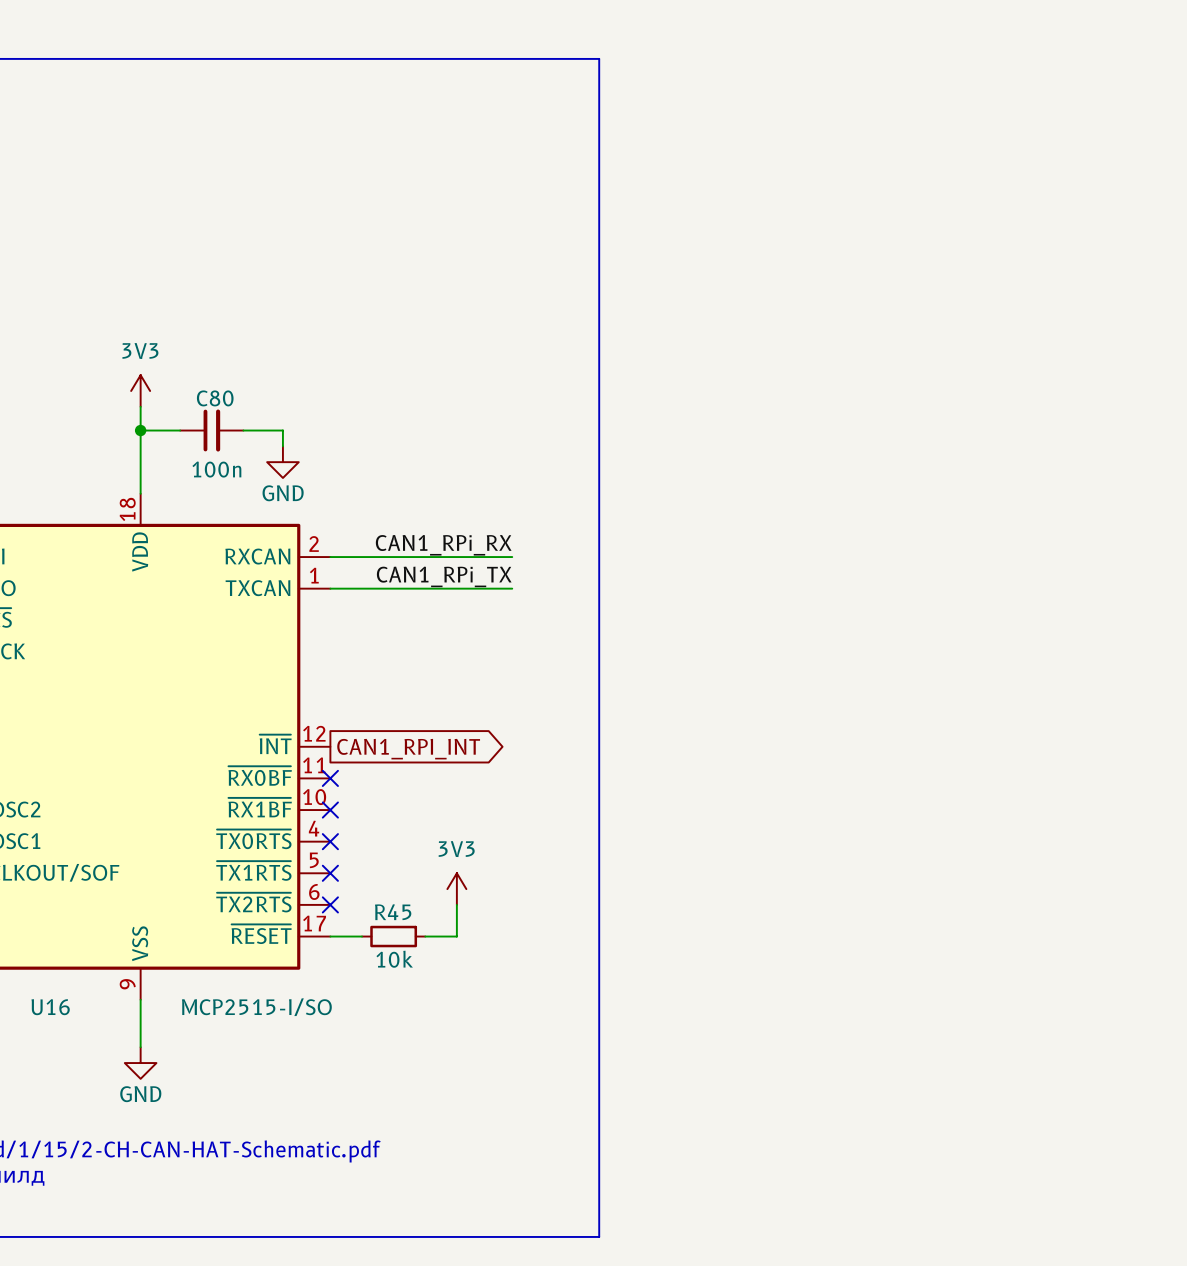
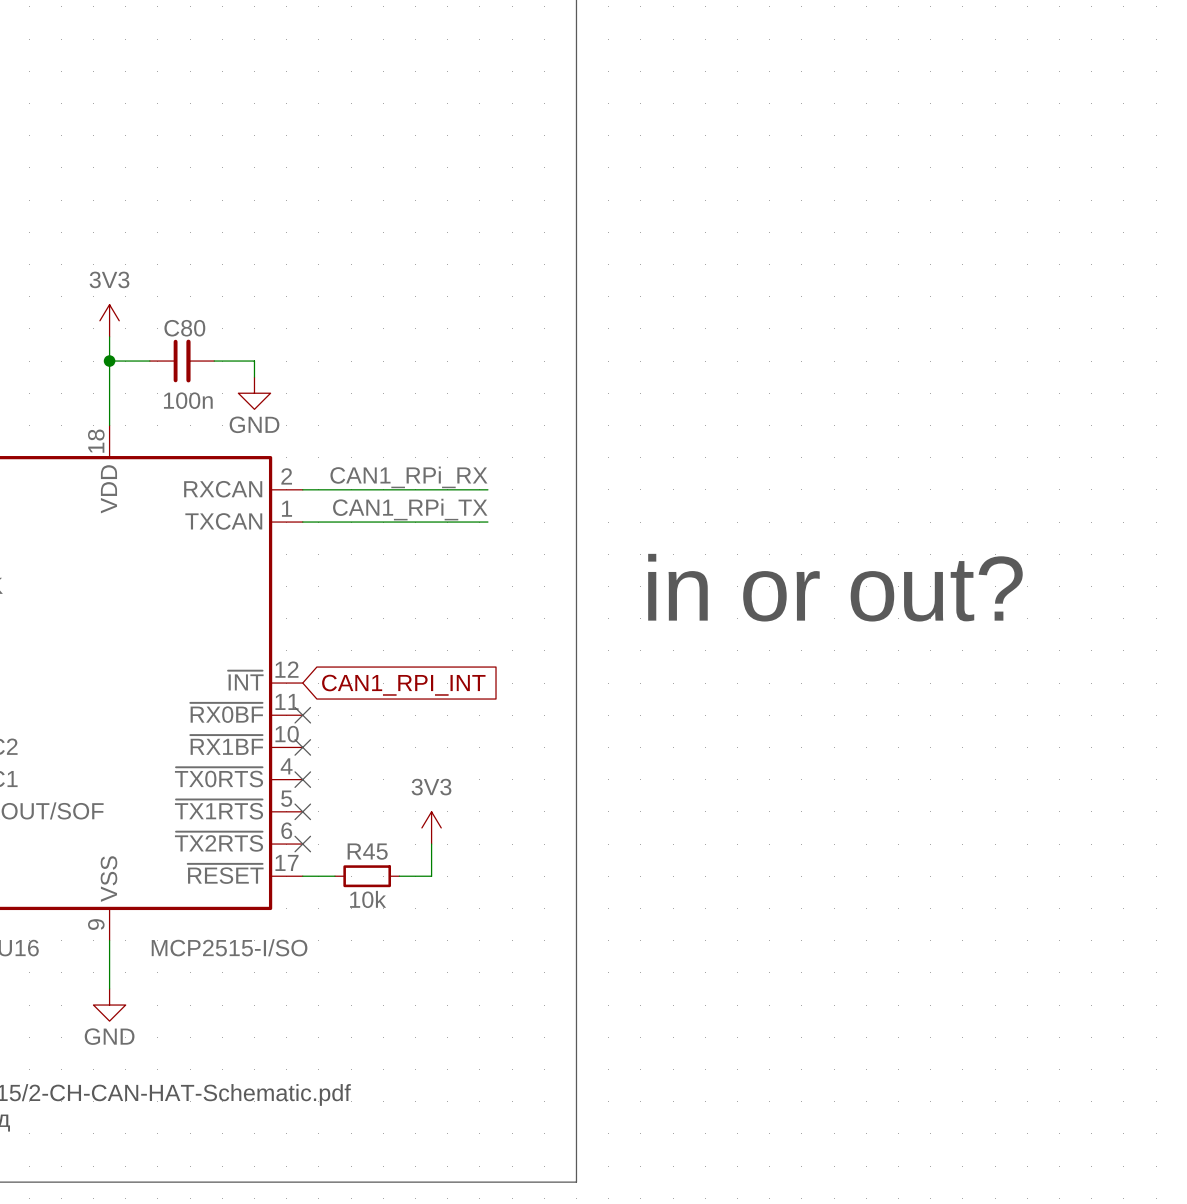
text: none -> in or out? (835, 587)
global label shape: output (408, 749) -> input (403, 685)

